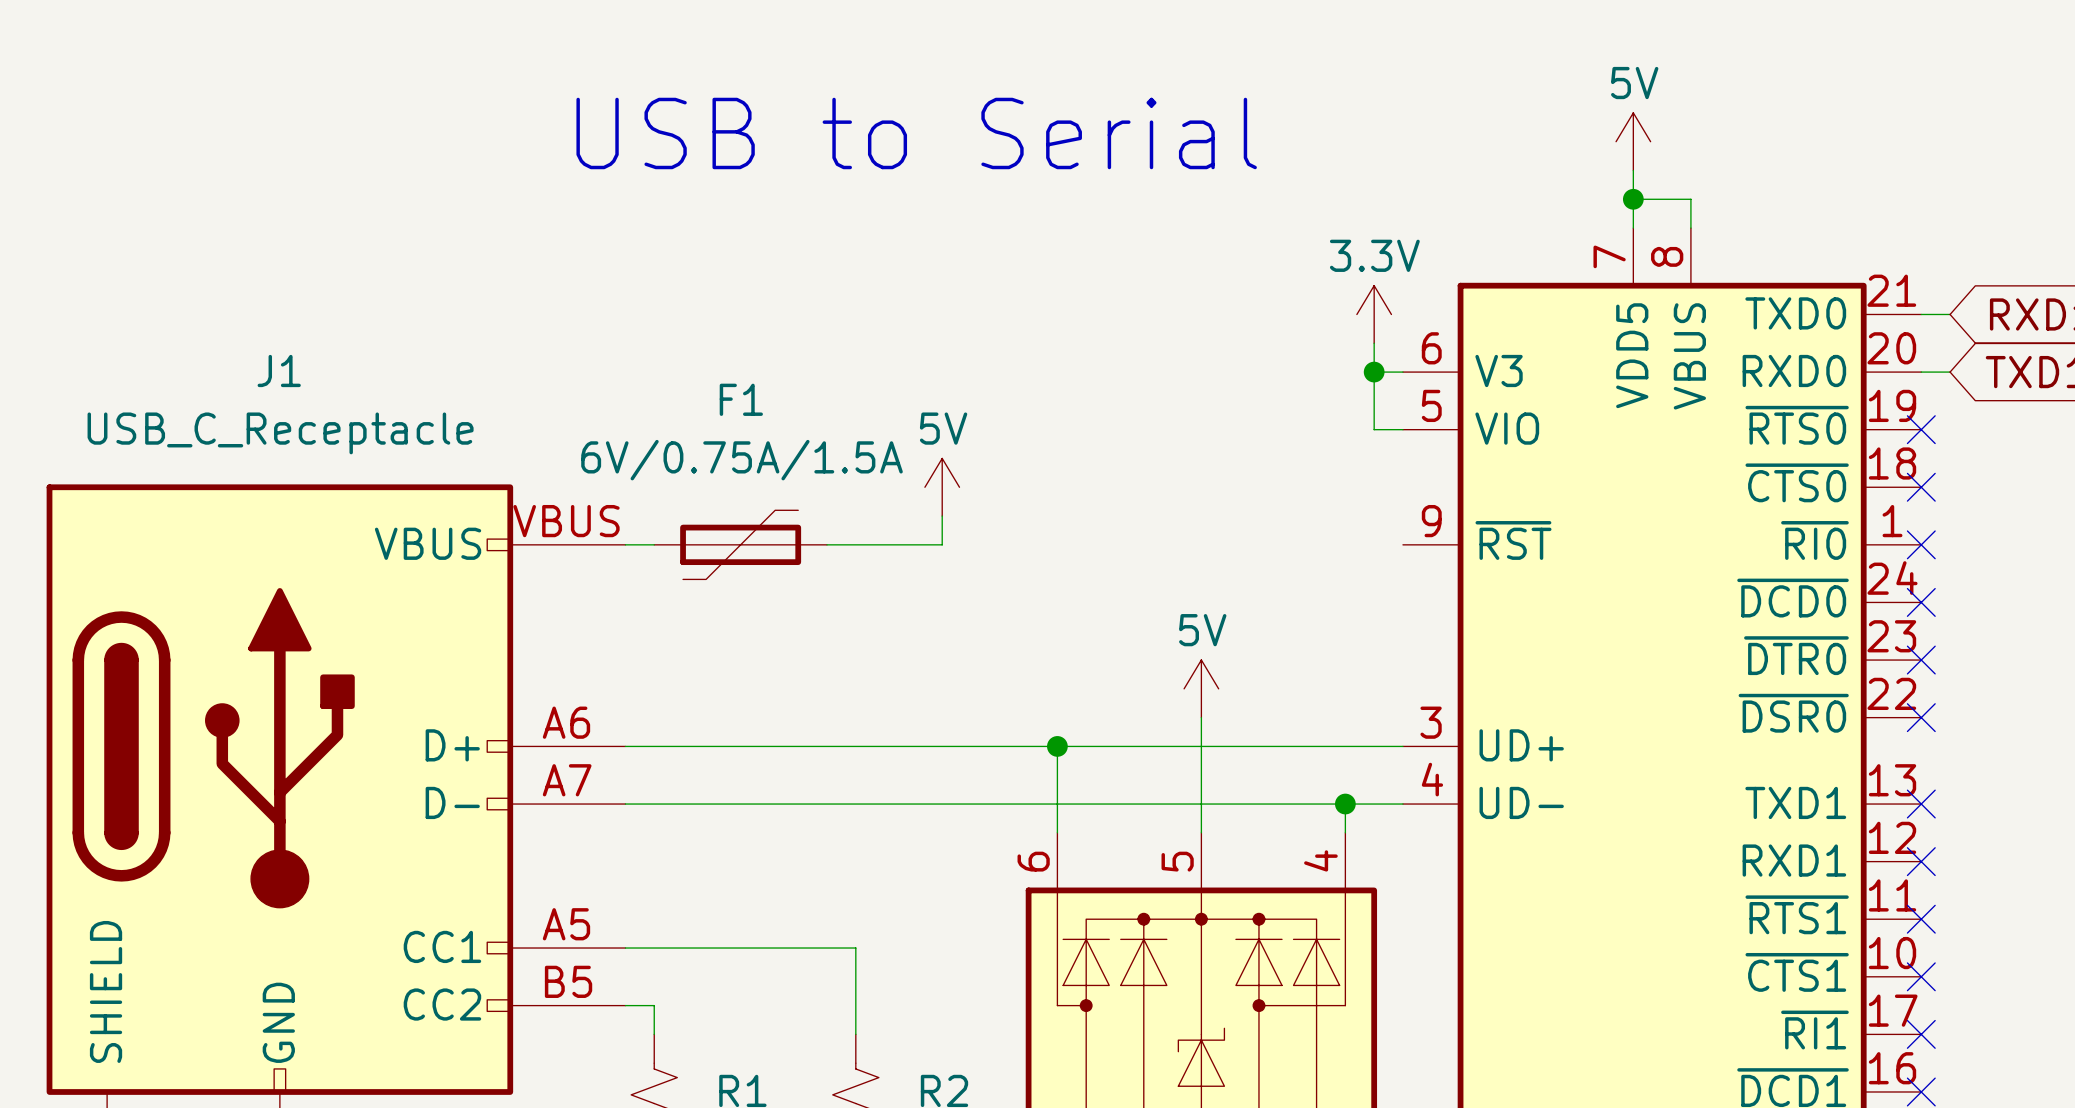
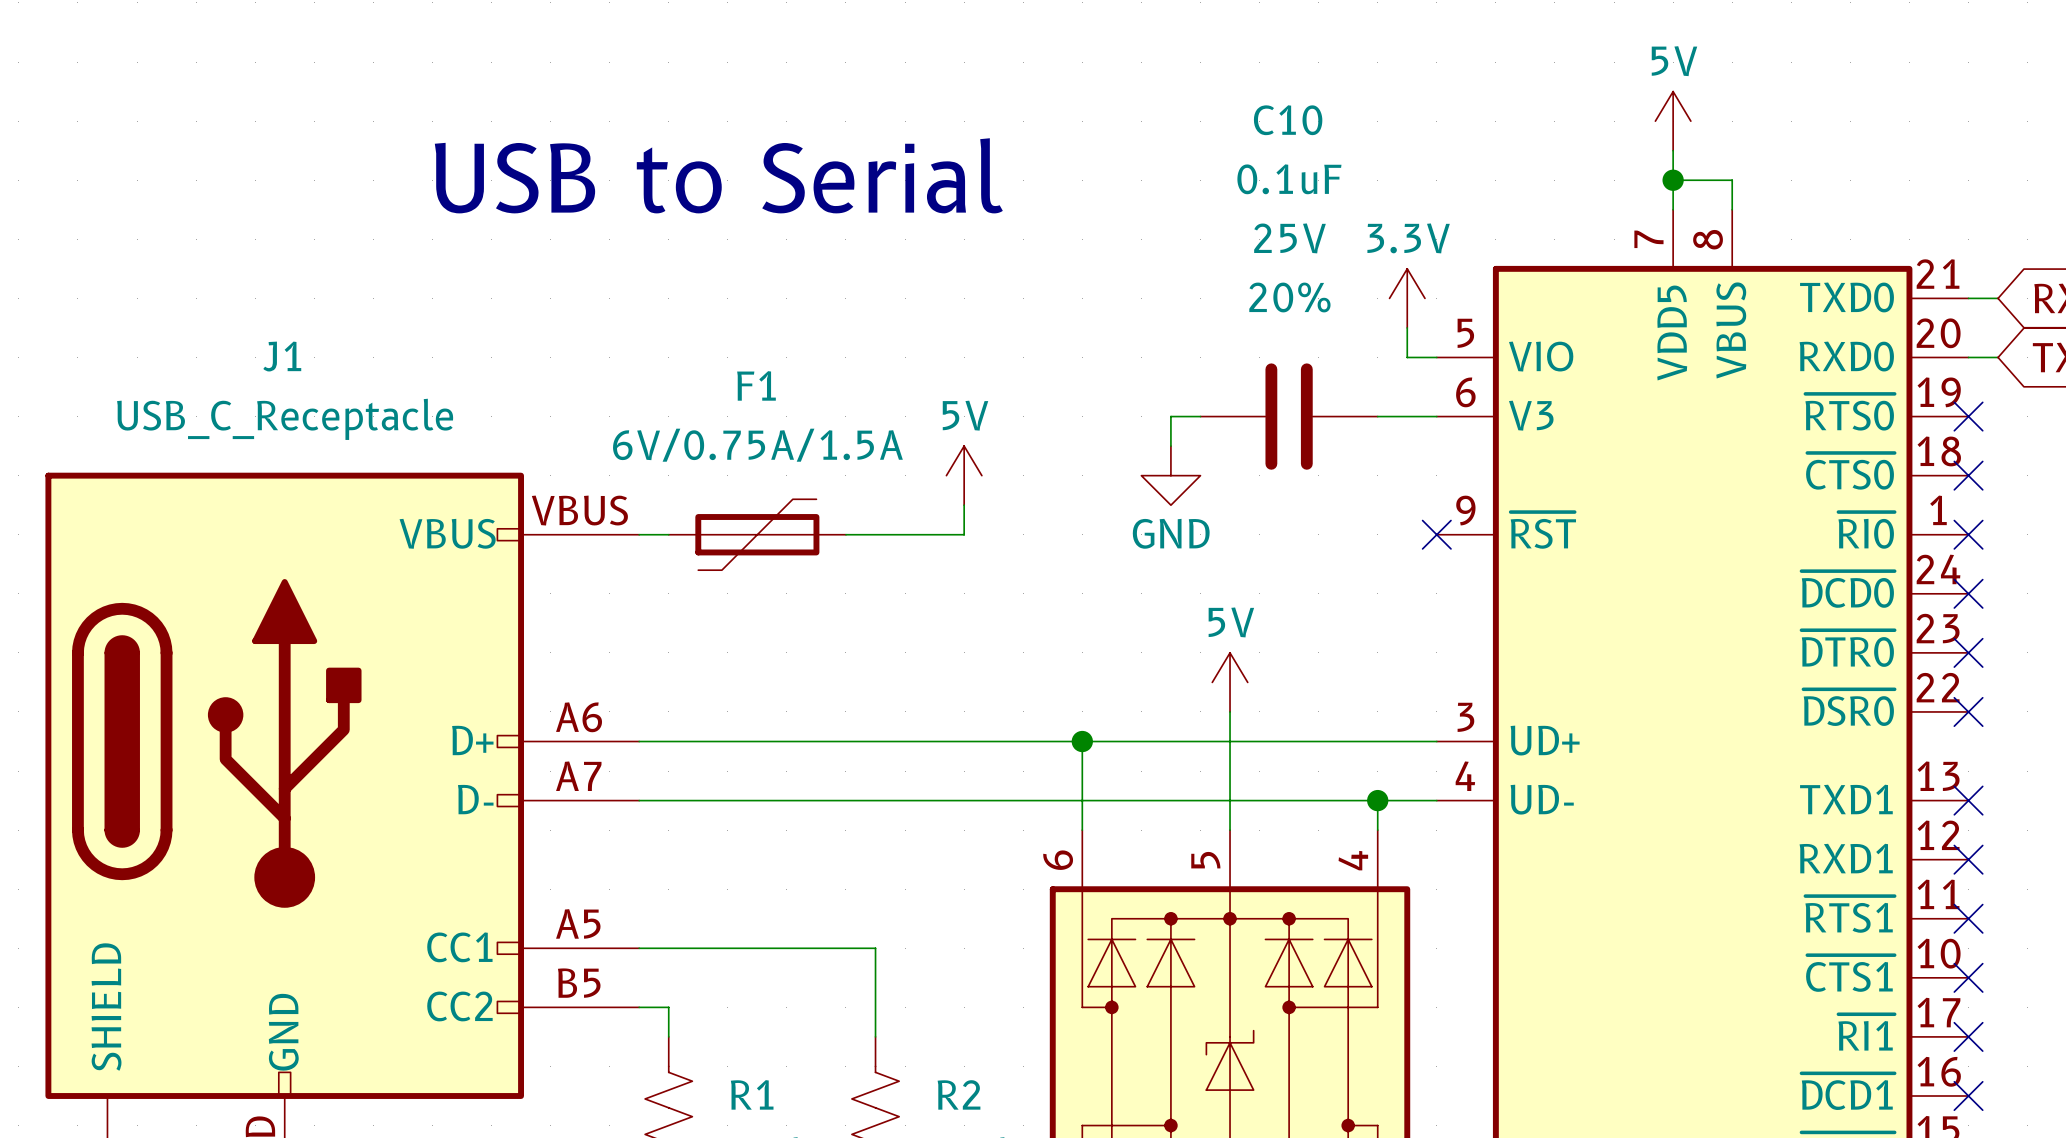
text position: USB to Serial (916, 133) -> USB to Serial (718, 175)
part pin number: 6 (1431, 348) -> 5 (1465, 333)
part pin name: V3 (1499, 370) -> VIO (1541, 356)
wire: (1374, 372) (1374, 429) -> (1377, 416) (1407, 416)
junction: (1374, 372) -> none
part pin number: 5 (1431, 405) -> 6 (1465, 392)
part pin name: VIO (1507, 428) -> V3 (1531, 415)
wire: none -> (1200, 416) (1170, 416) (1170, 446)
C10: none -> 0.1uF (1289, 416)
power symbol: none -> GND (1170, 475)
no-connect mark: none -> (1436, 534)

